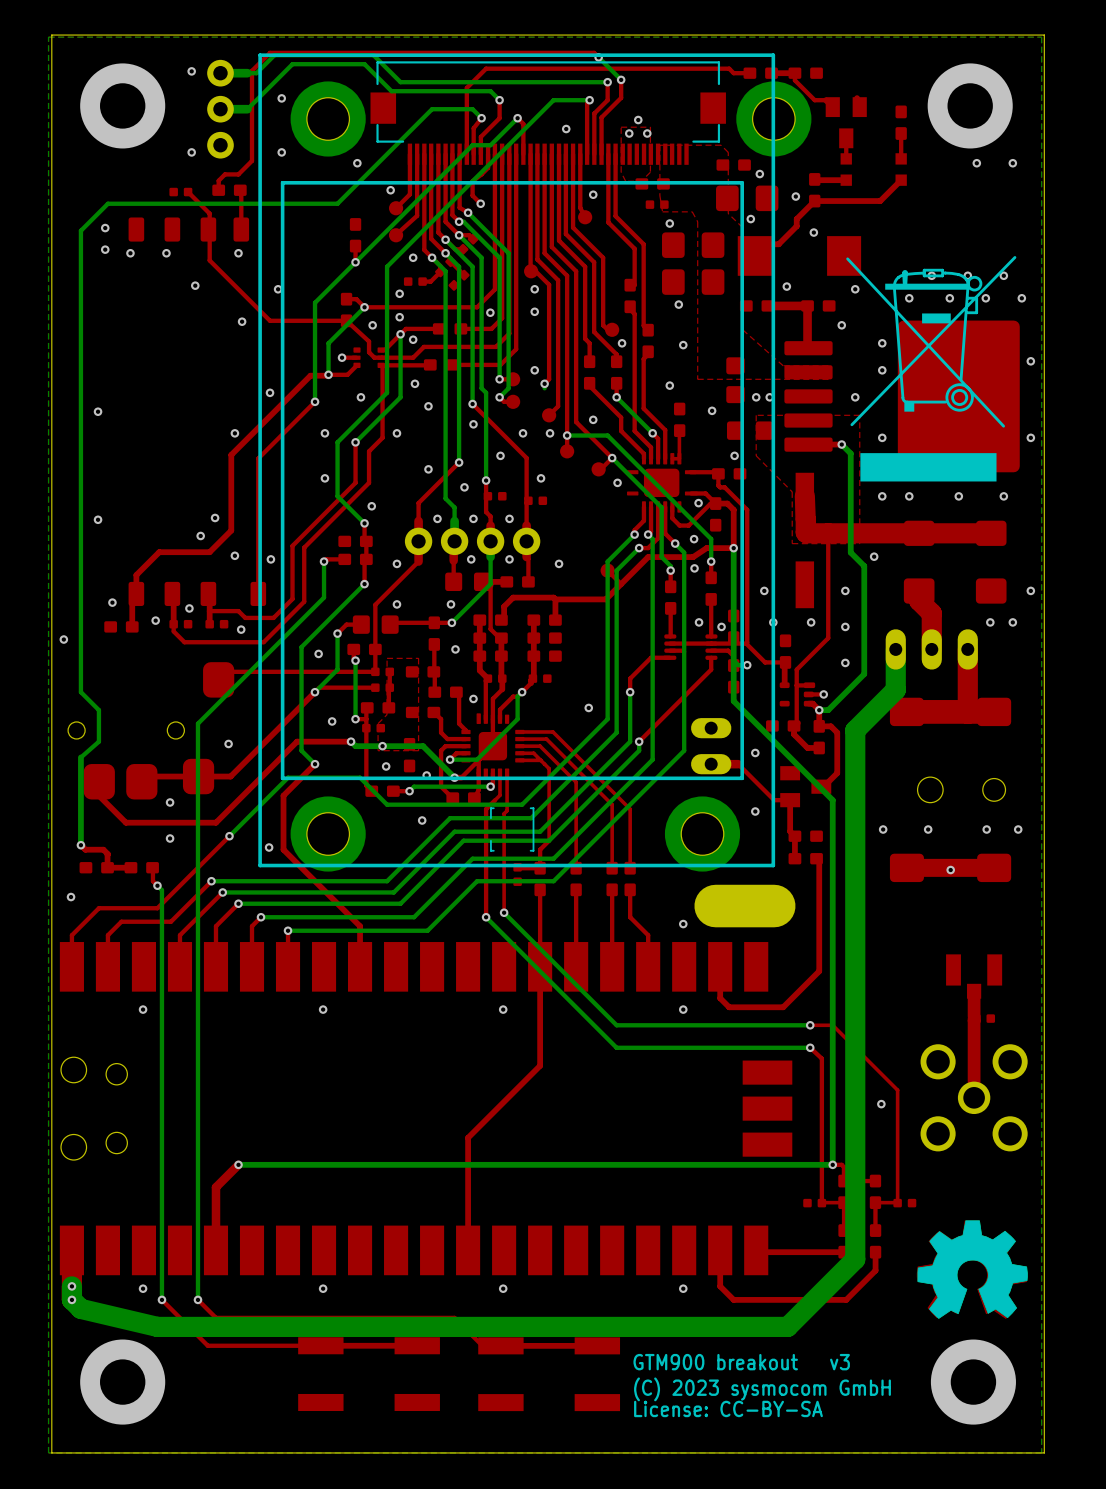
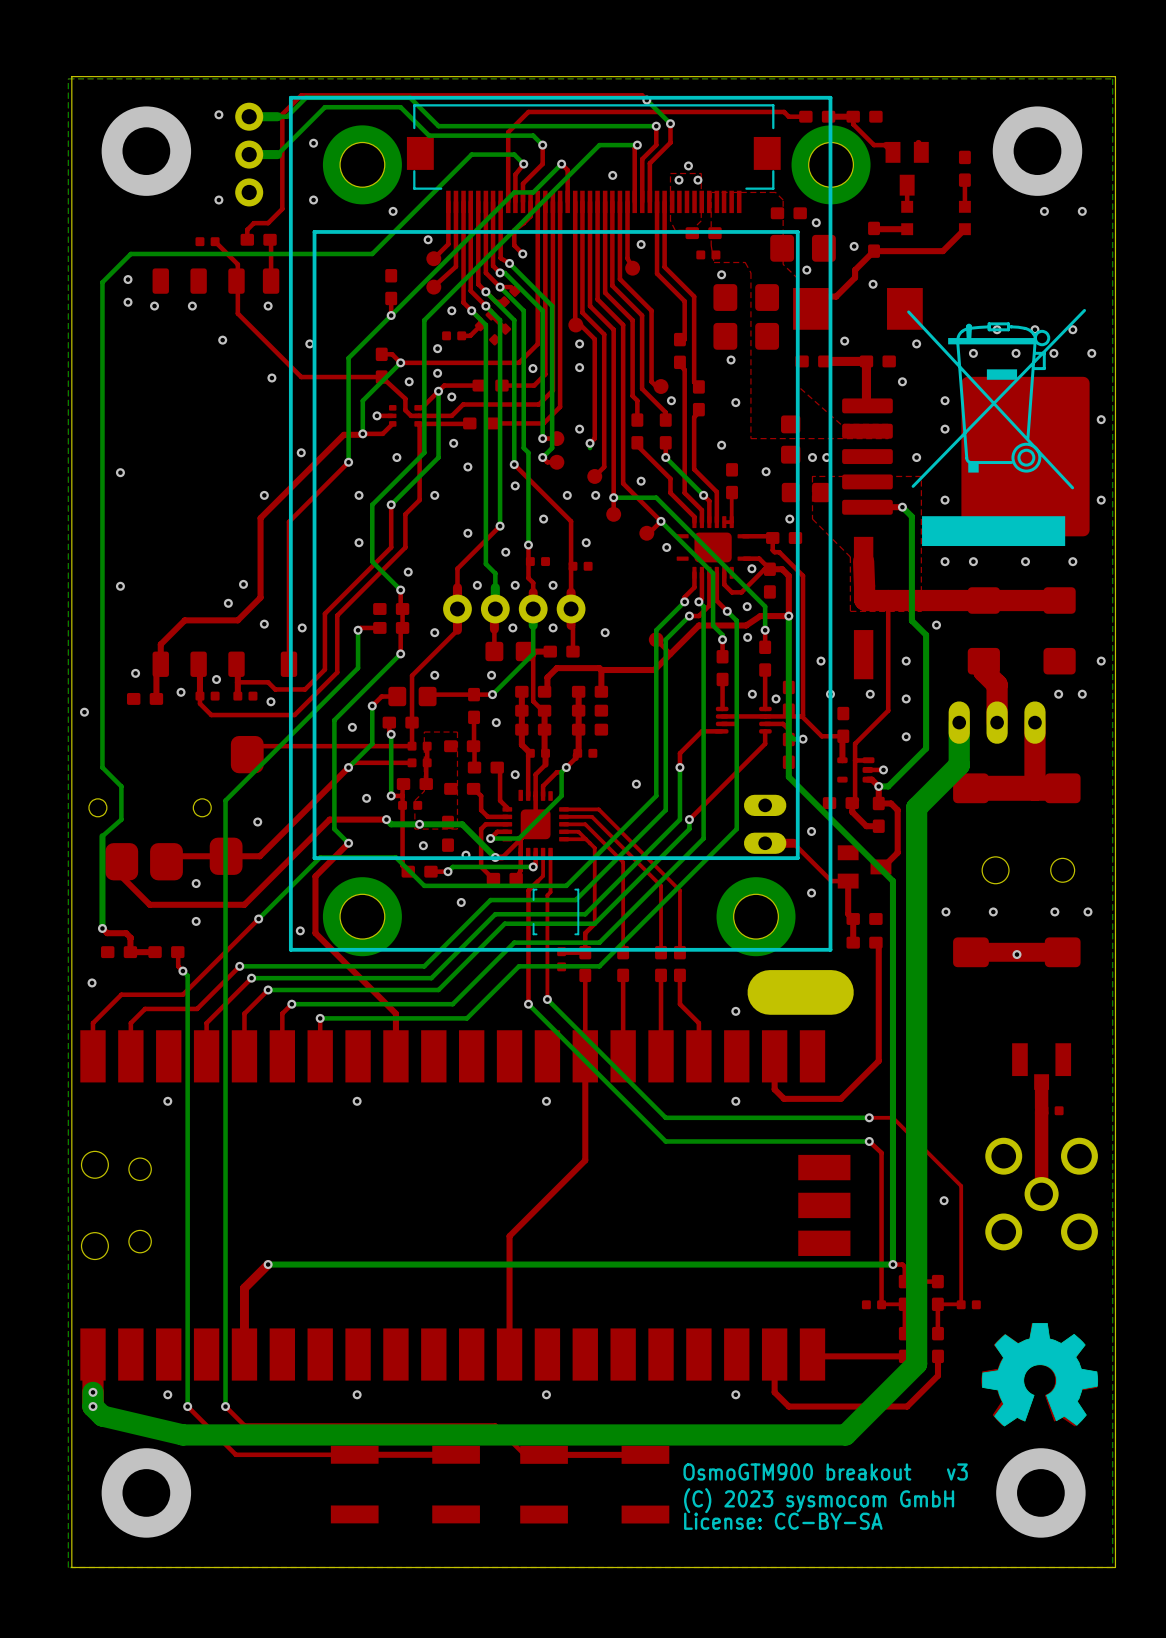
text: GTM900 breakout (715, 1362) -> OsmoGTM900 breakout (797, 1472)
text position: v3 (839, 1362) -> v3 (957, 1472)

